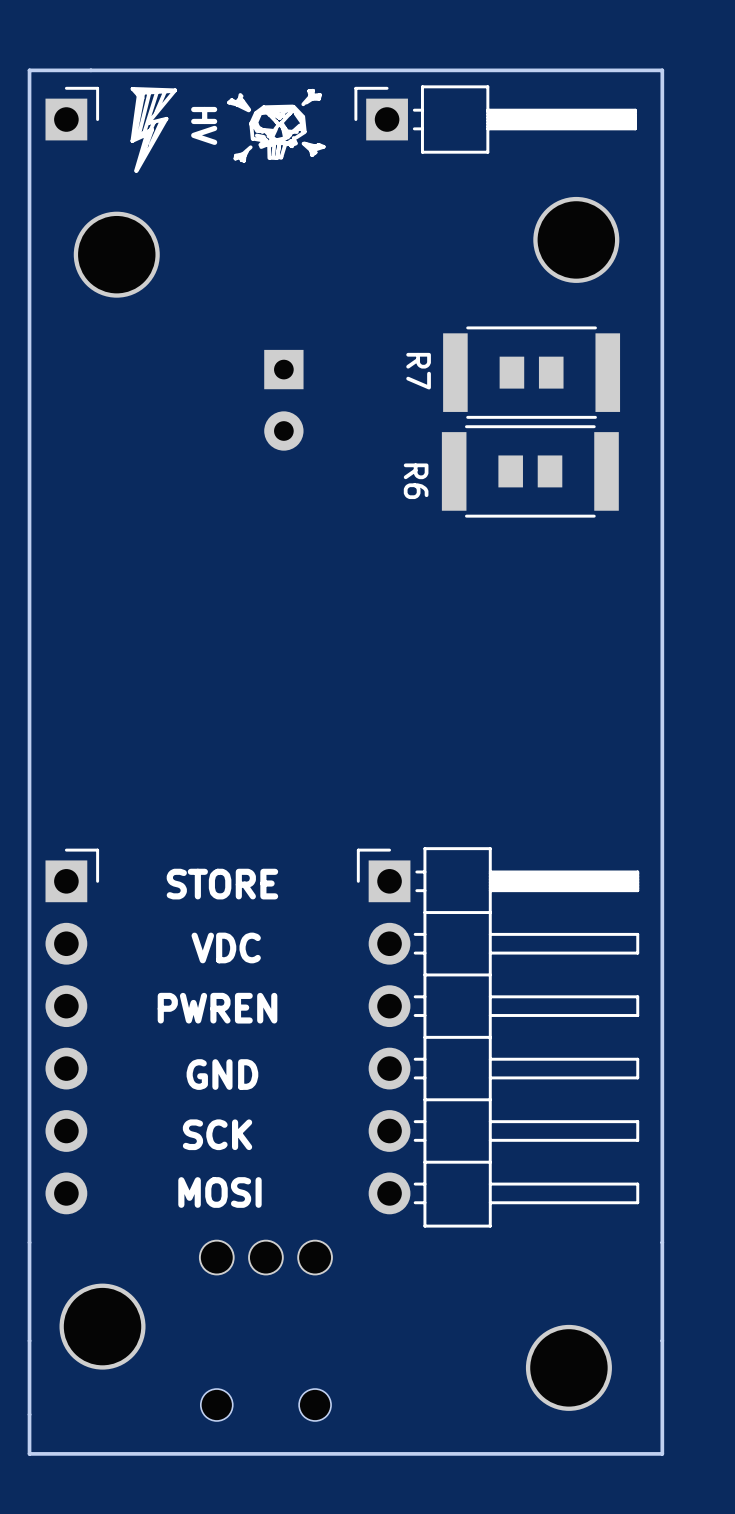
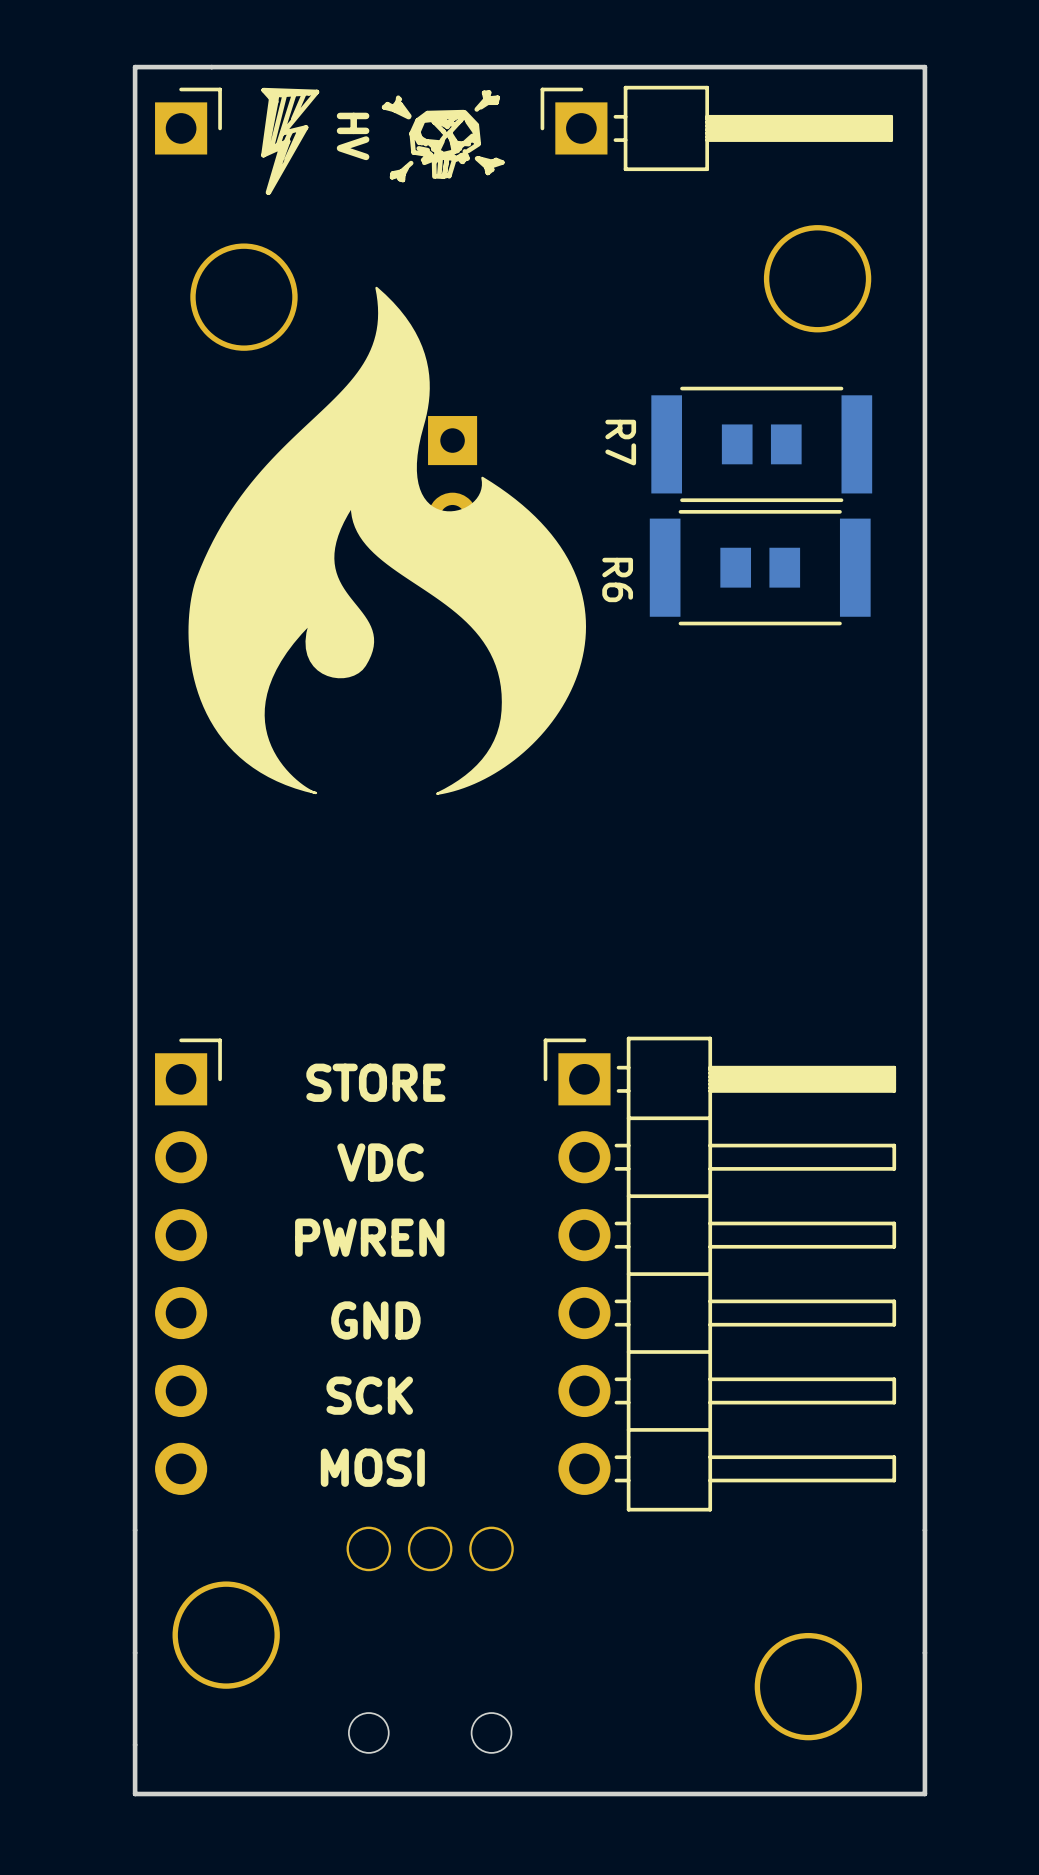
drawing: none -> [188, 286, 587, 795]

